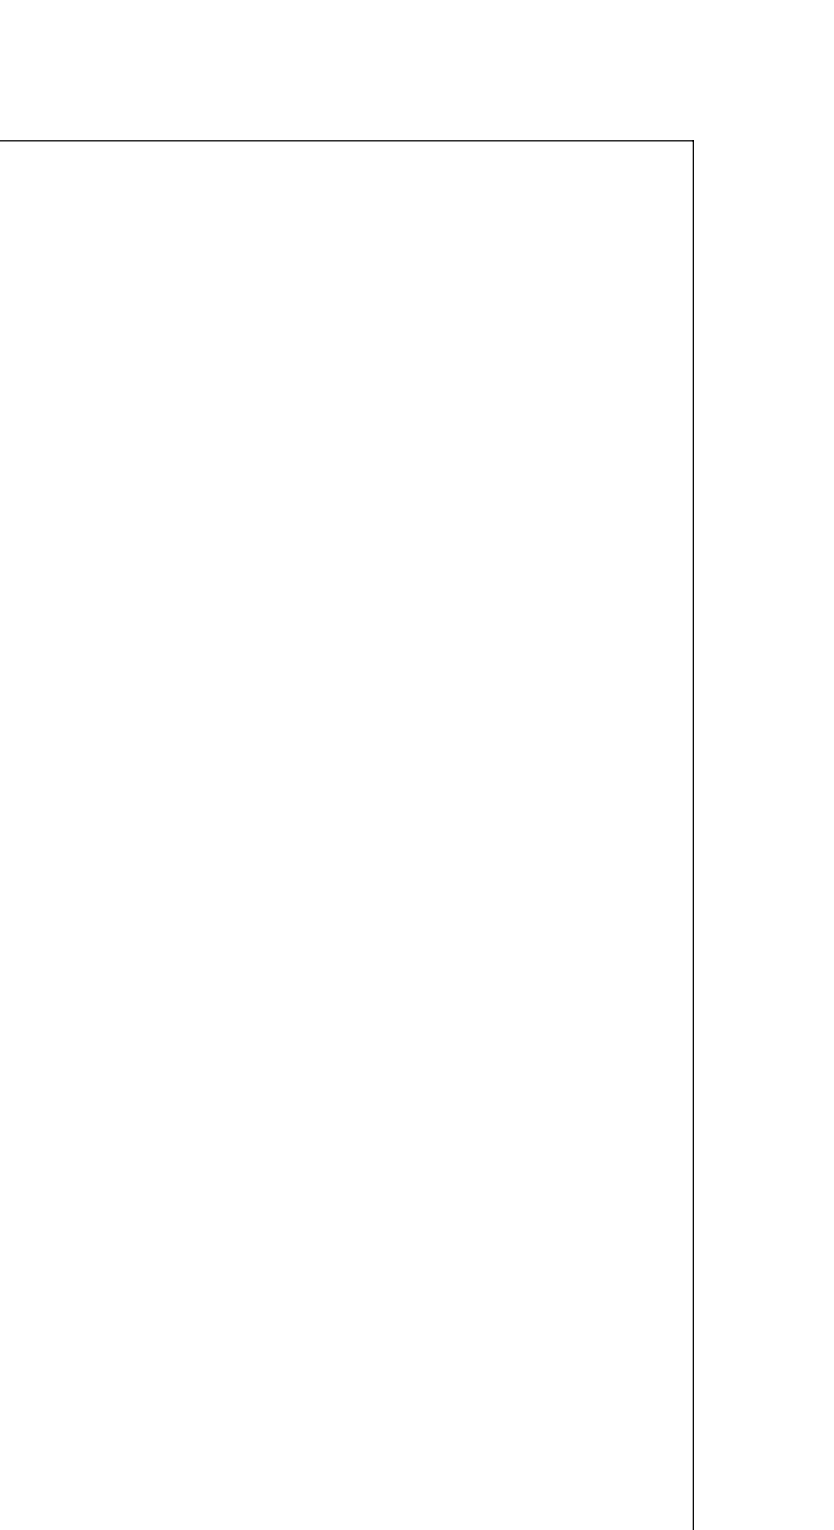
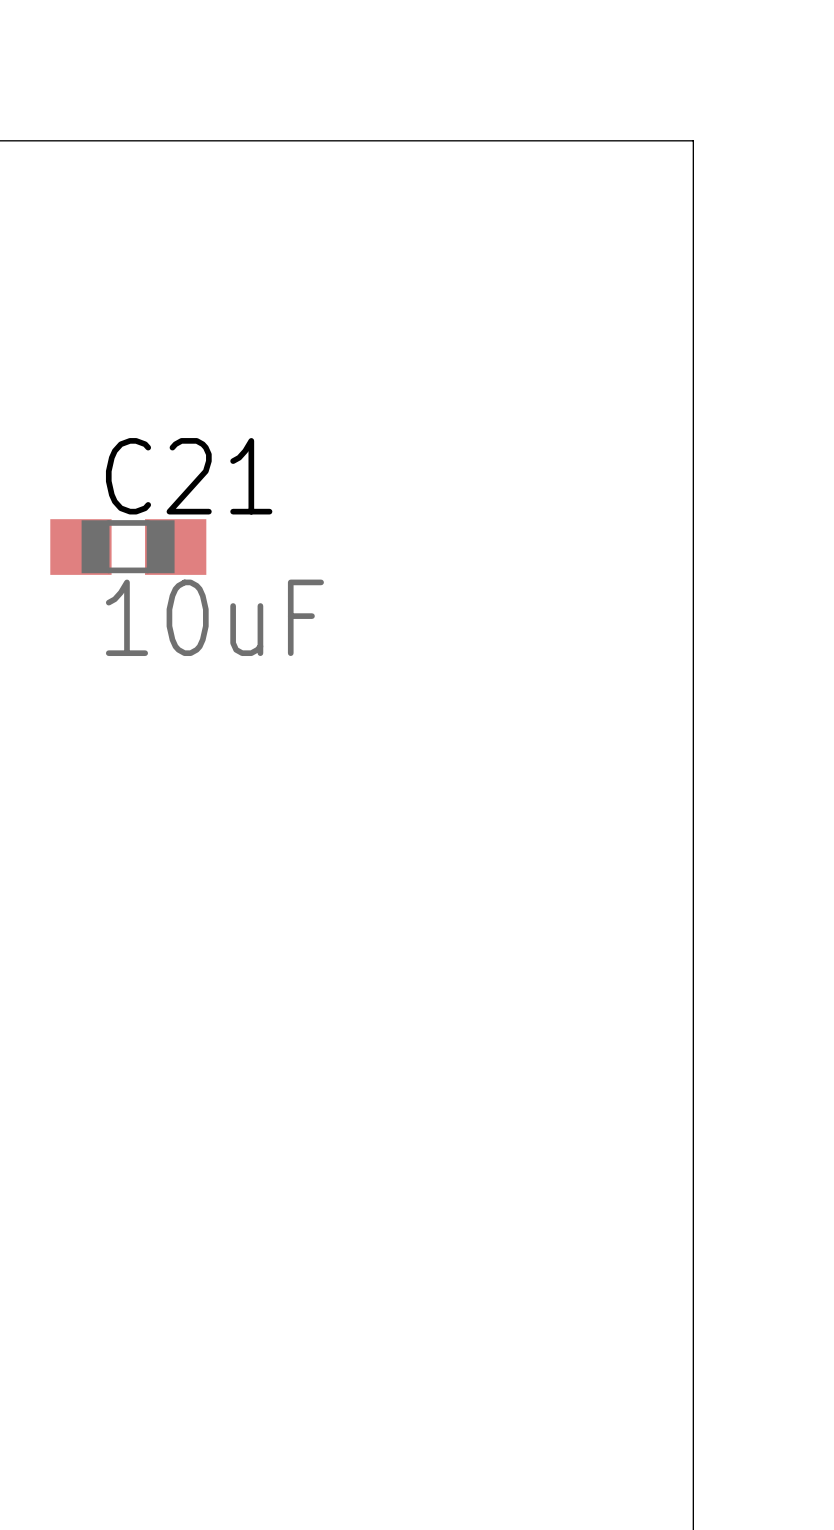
C21: none -> 10uF (128, 547)

